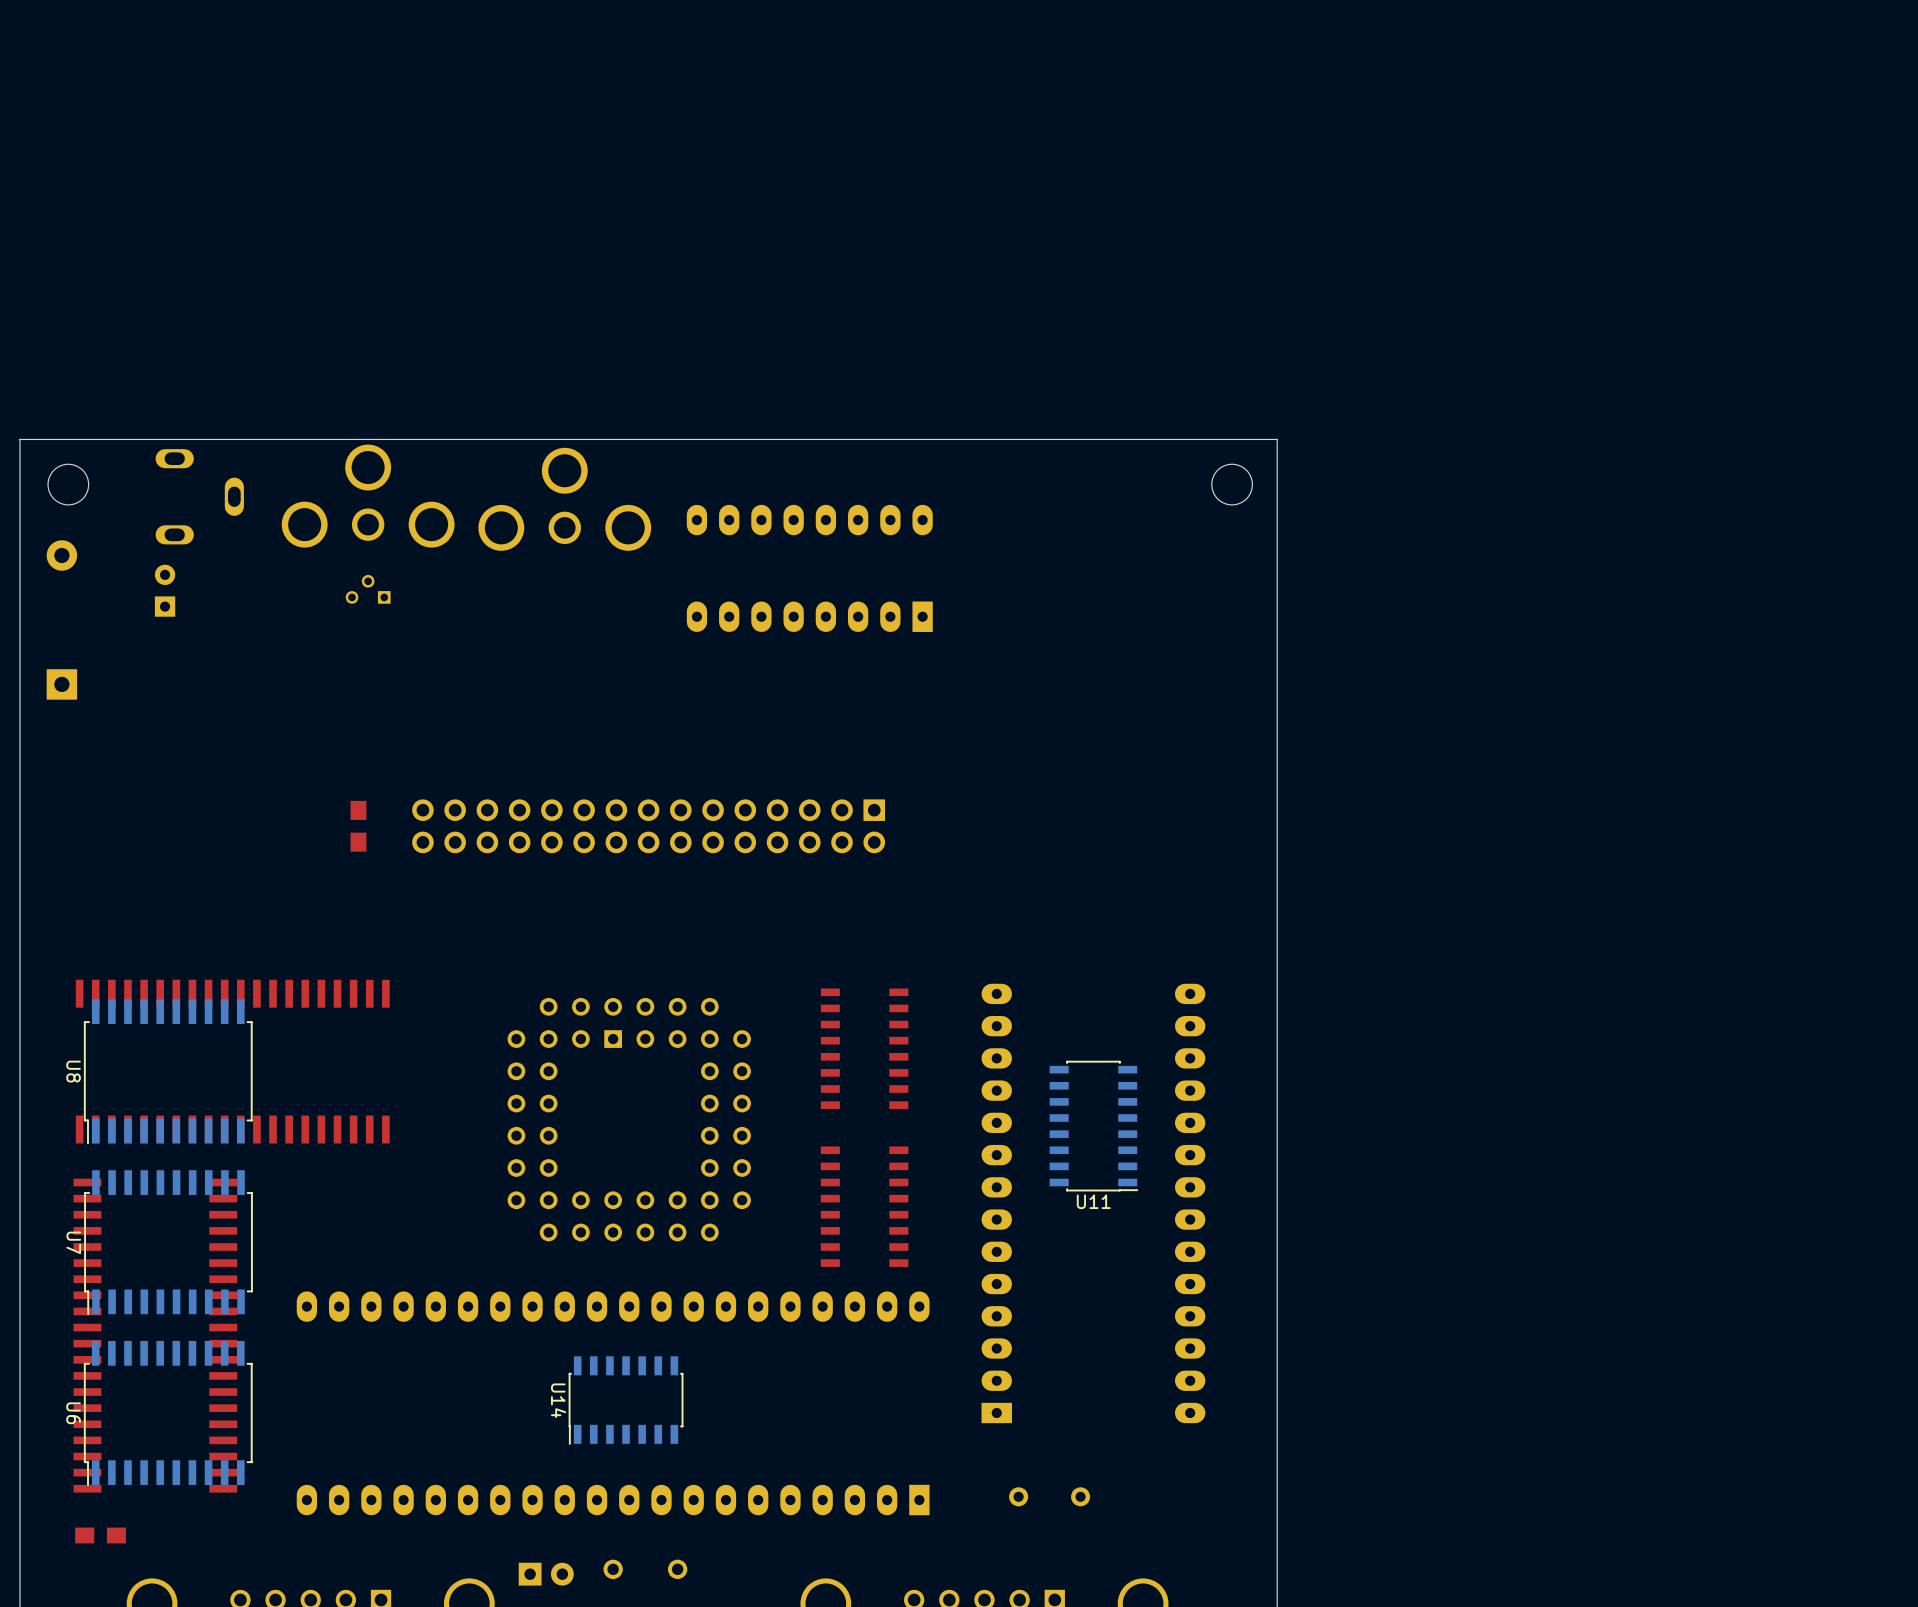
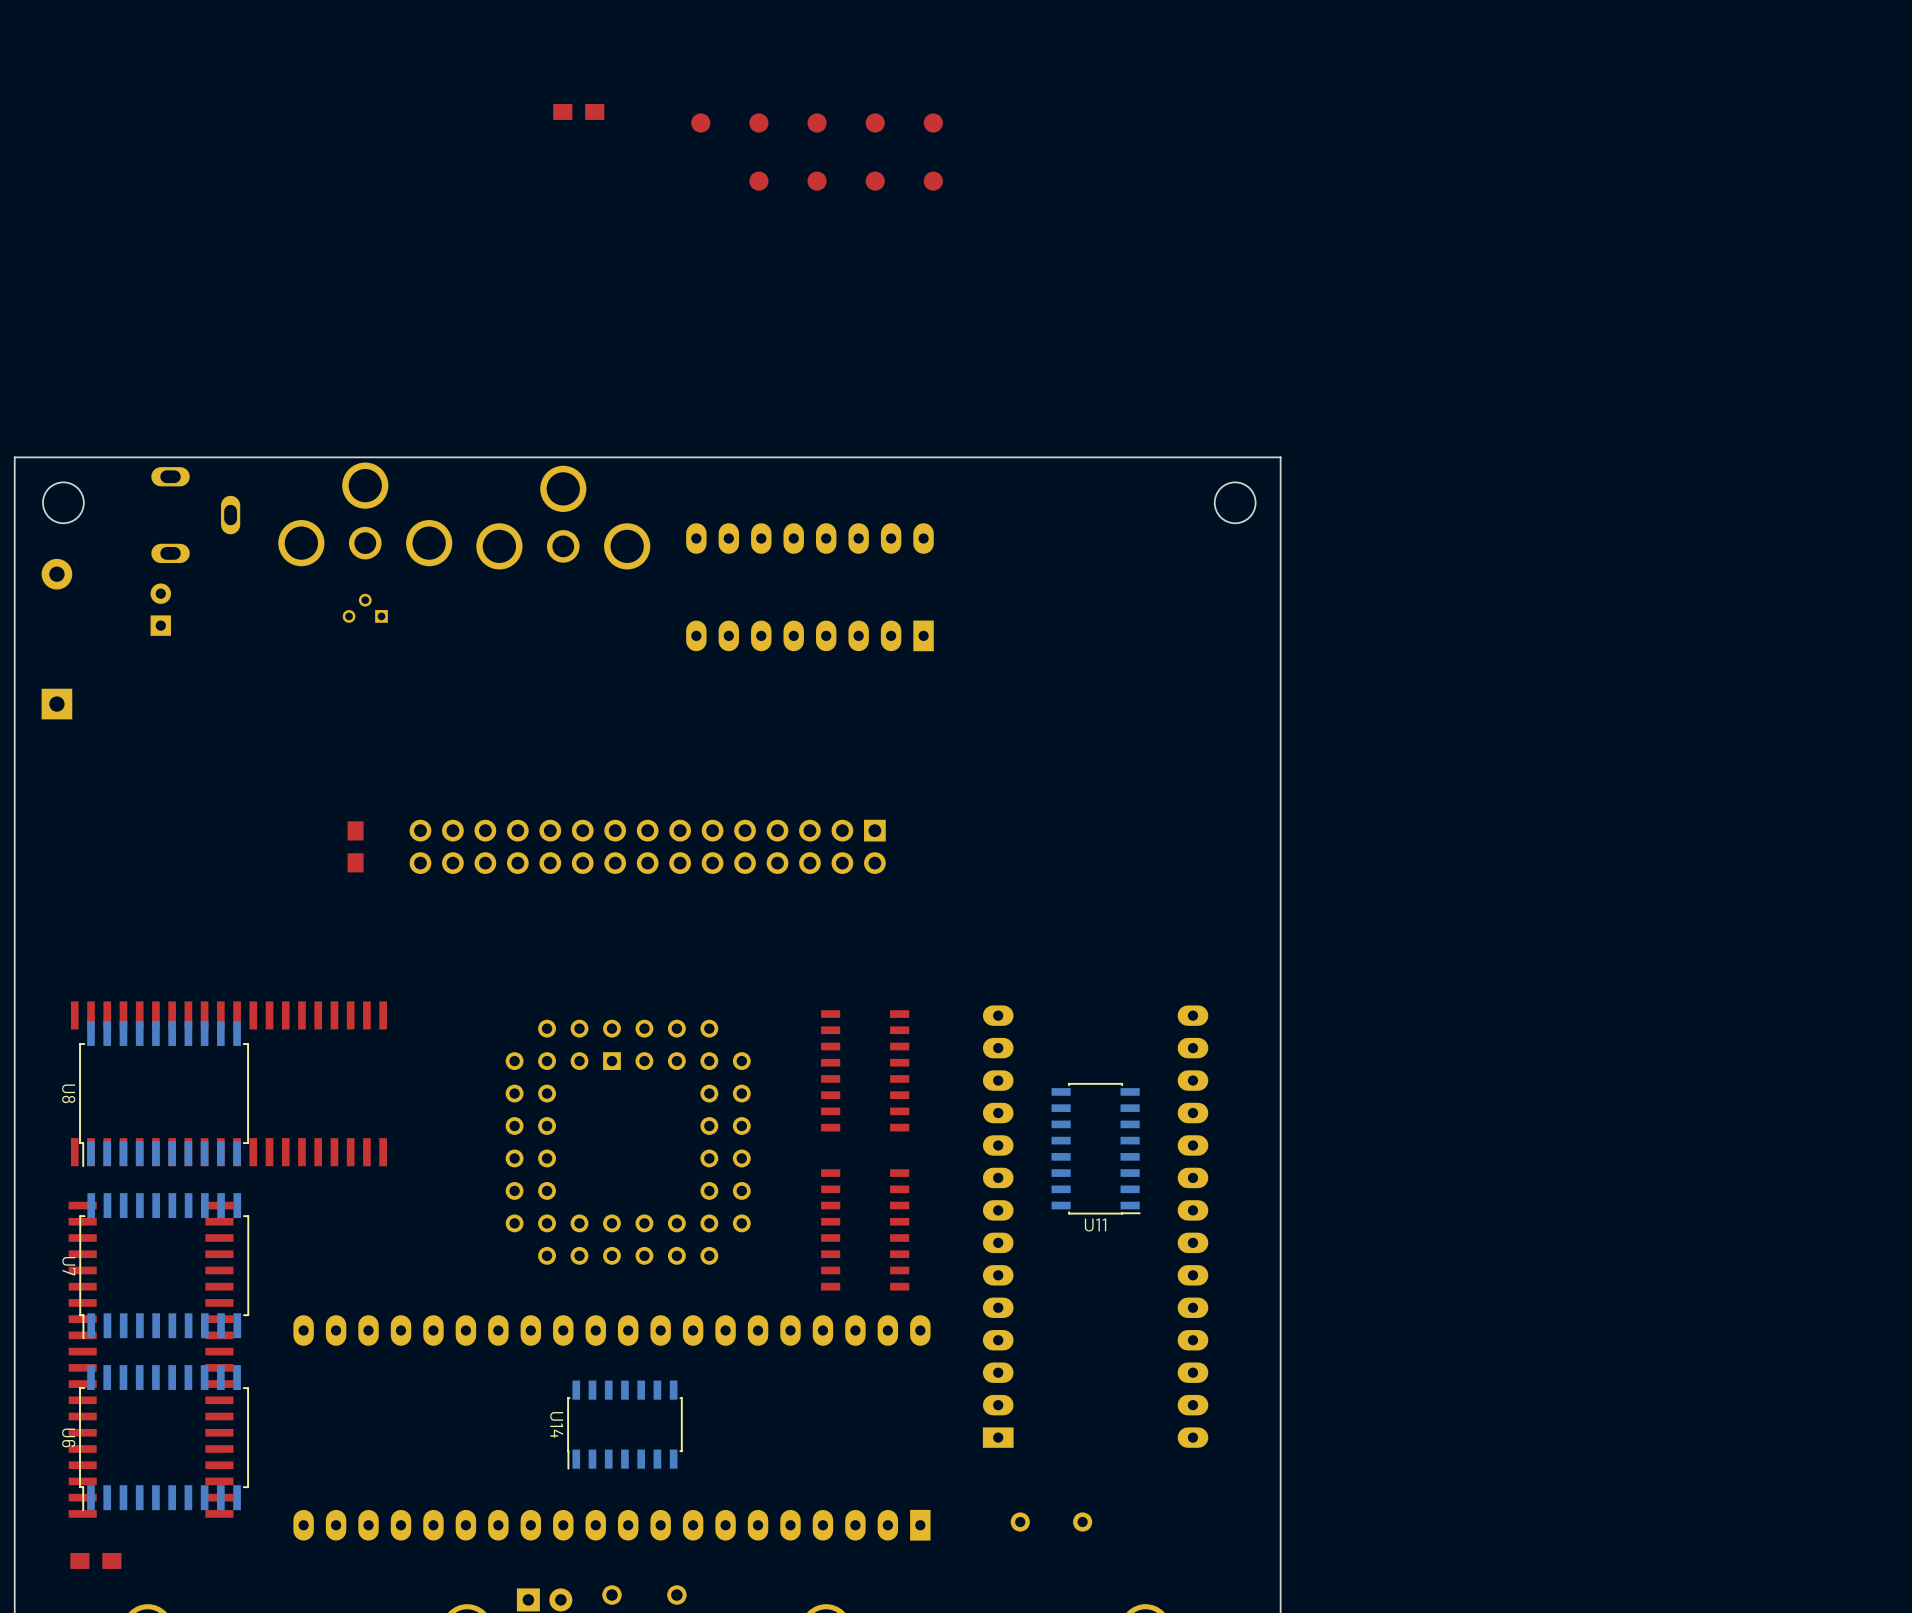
part: none -> (578, 111)
part: none -> (700, 122)
part: none -> (758, 122)
part: none -> (817, 122)
part: none -> (875, 122)
part: none -> (933, 122)
part: none -> (758, 181)
part: none -> (817, 181)
part: none -> (875, 181)
part: none -> (933, 181)

